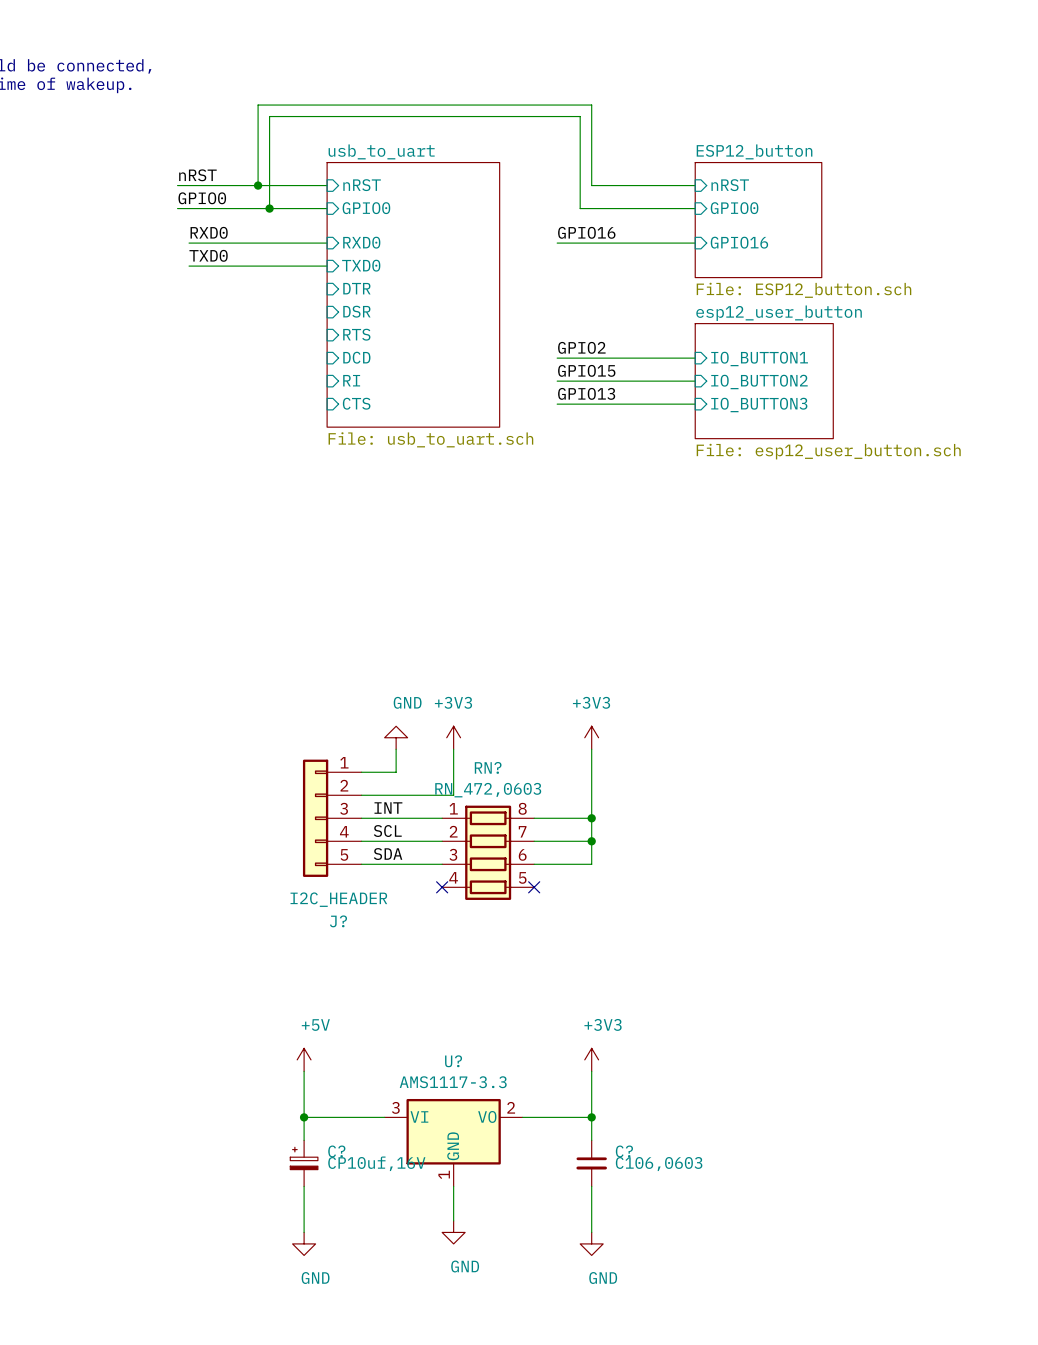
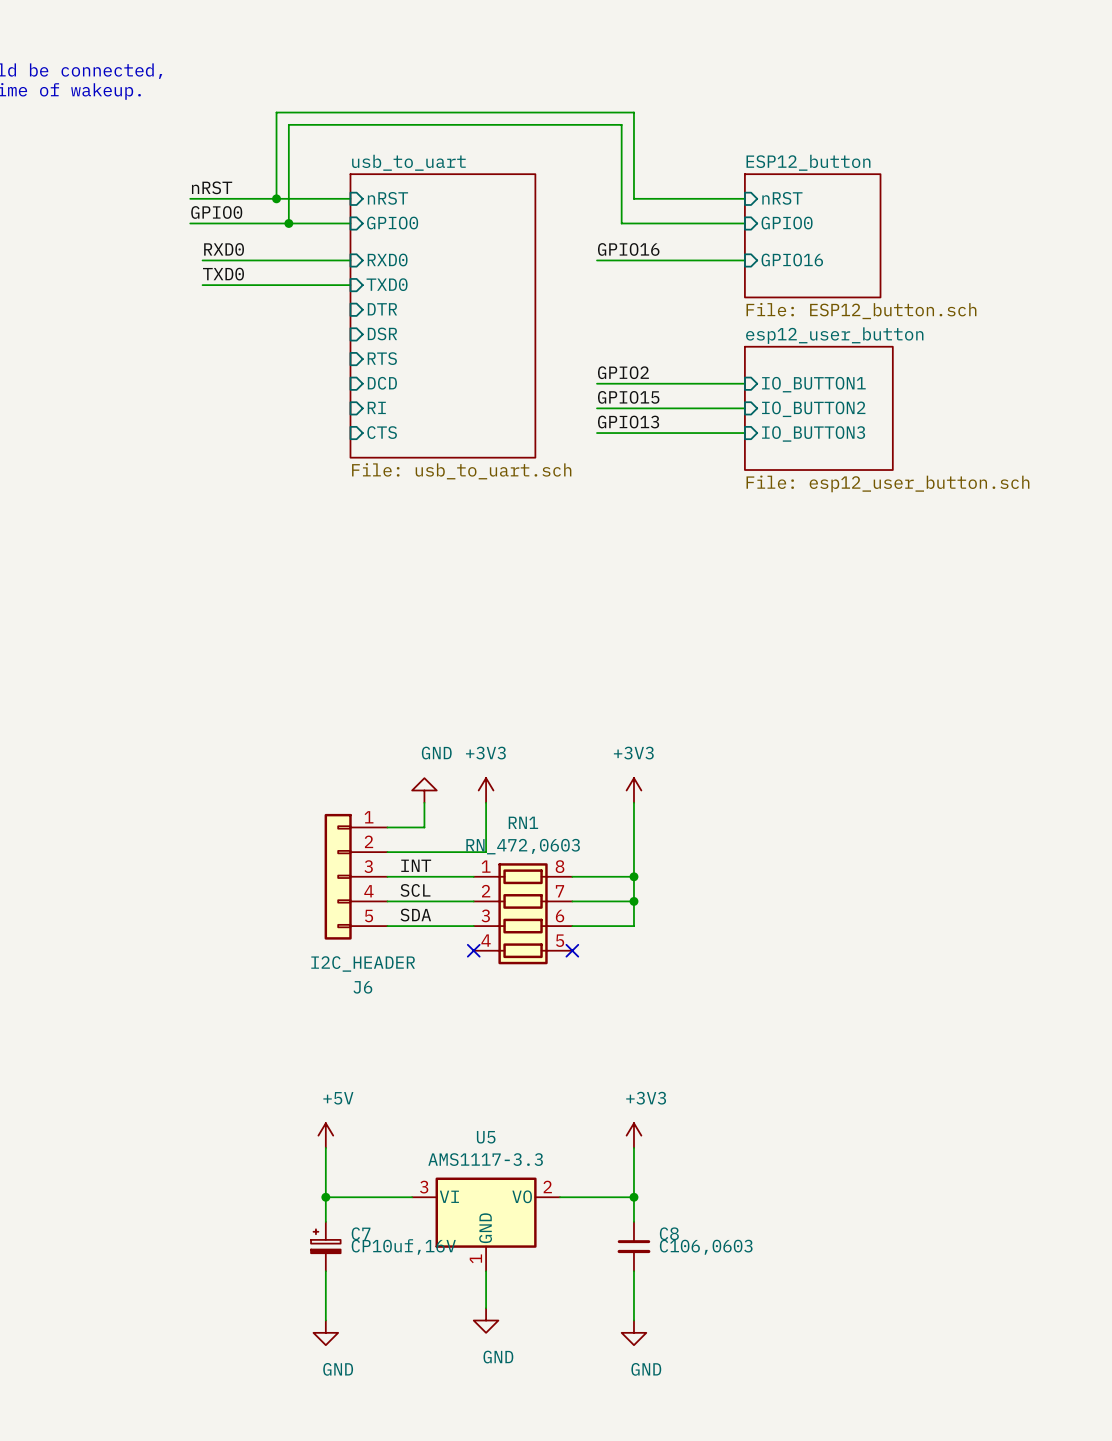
RN? name: RN? (488, 767) -> RN1 (523, 822)
J? name: J? (338, 921) -> J6 (362, 987)
U? name: U? (453, 1061) -> U5 (486, 1137)
C? name: C? (336, 1151) -> C7 (361, 1233)
C? name: C? (624, 1151) -> C8 (669, 1233)

